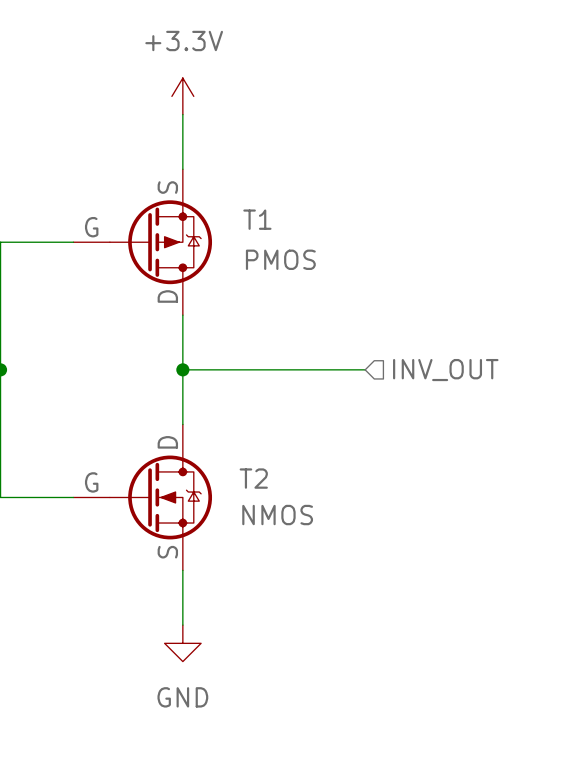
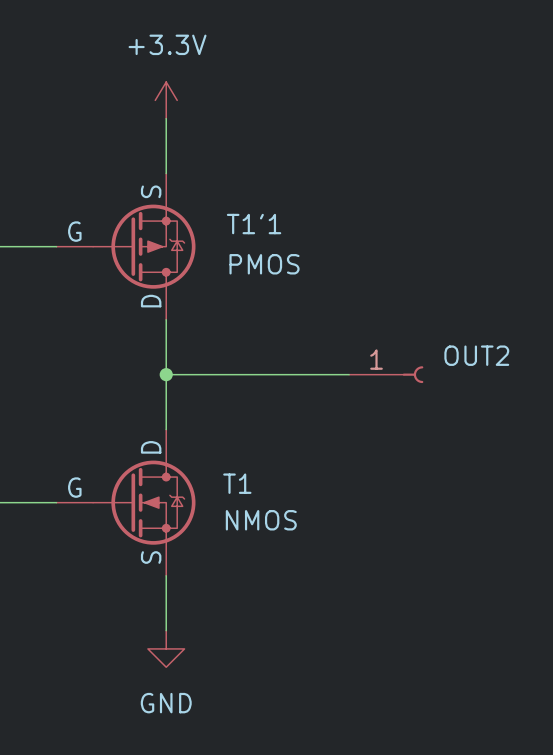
T1 name: T1 (257, 219) -> T1'1 (254, 224)
OUT2: none -> (386, 374)
hierarchical label: INV_OUT (445, 370) -> none
T2 name: T2 (253, 478) -> T1 (237, 483)

